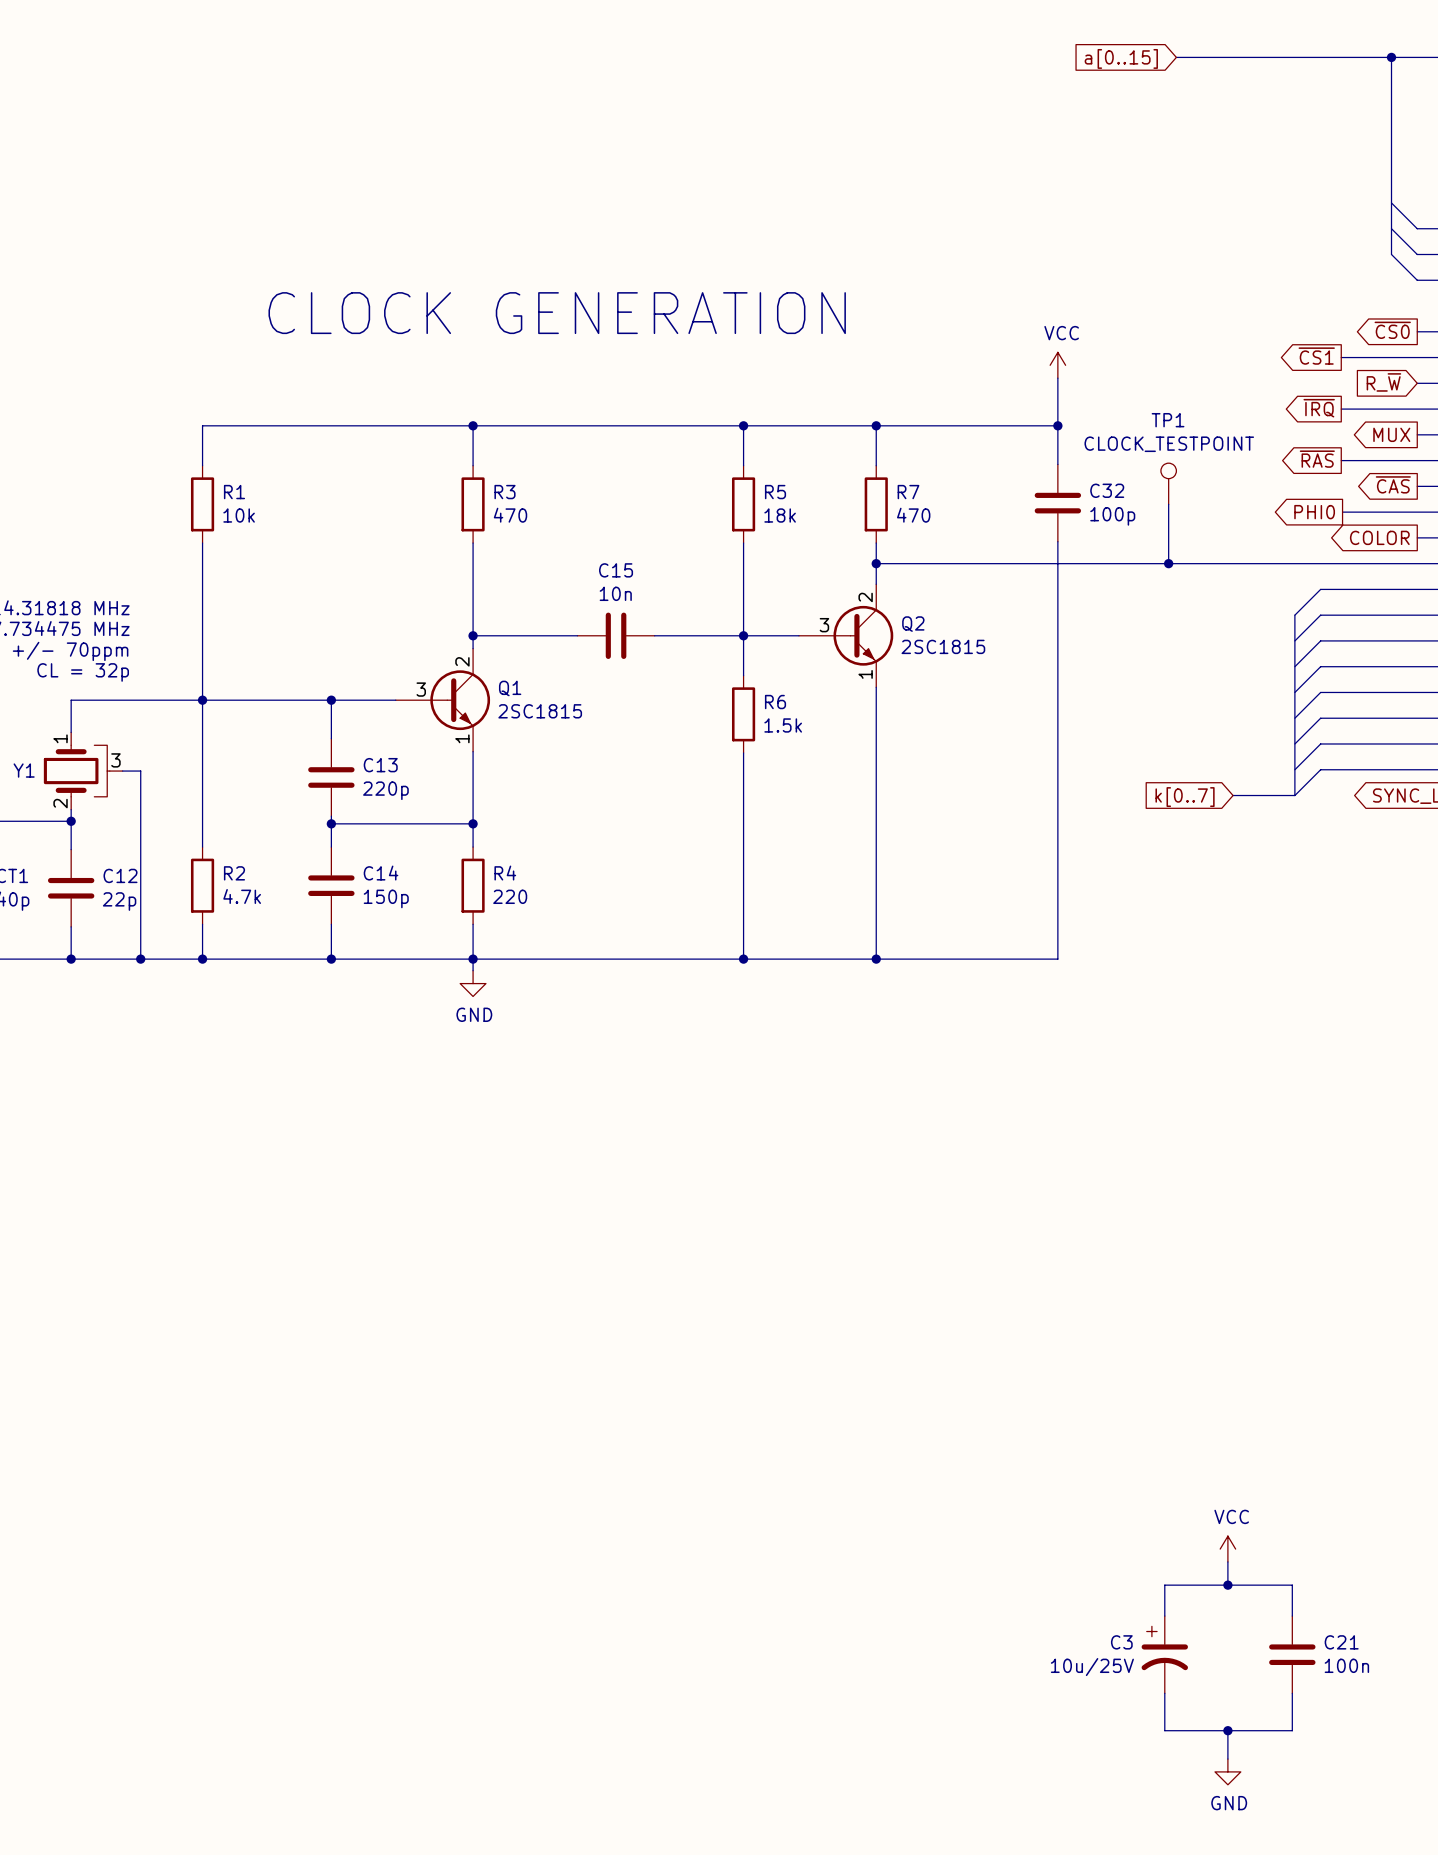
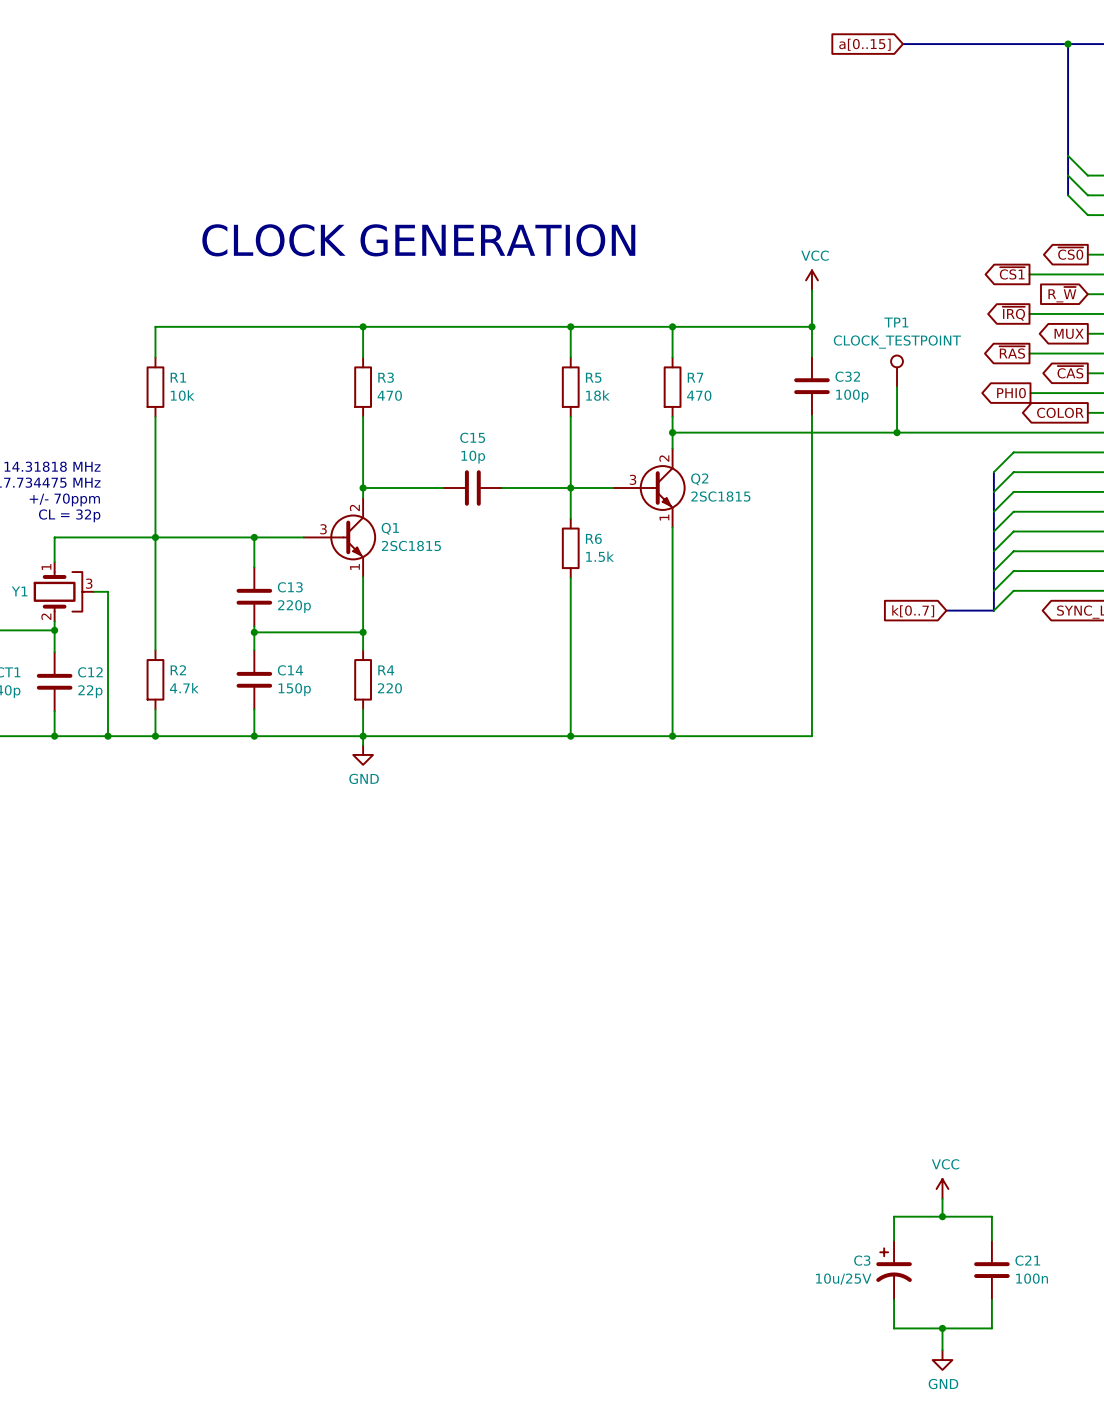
C15 value: 10n (615, 593) -> 10p (473, 457)

